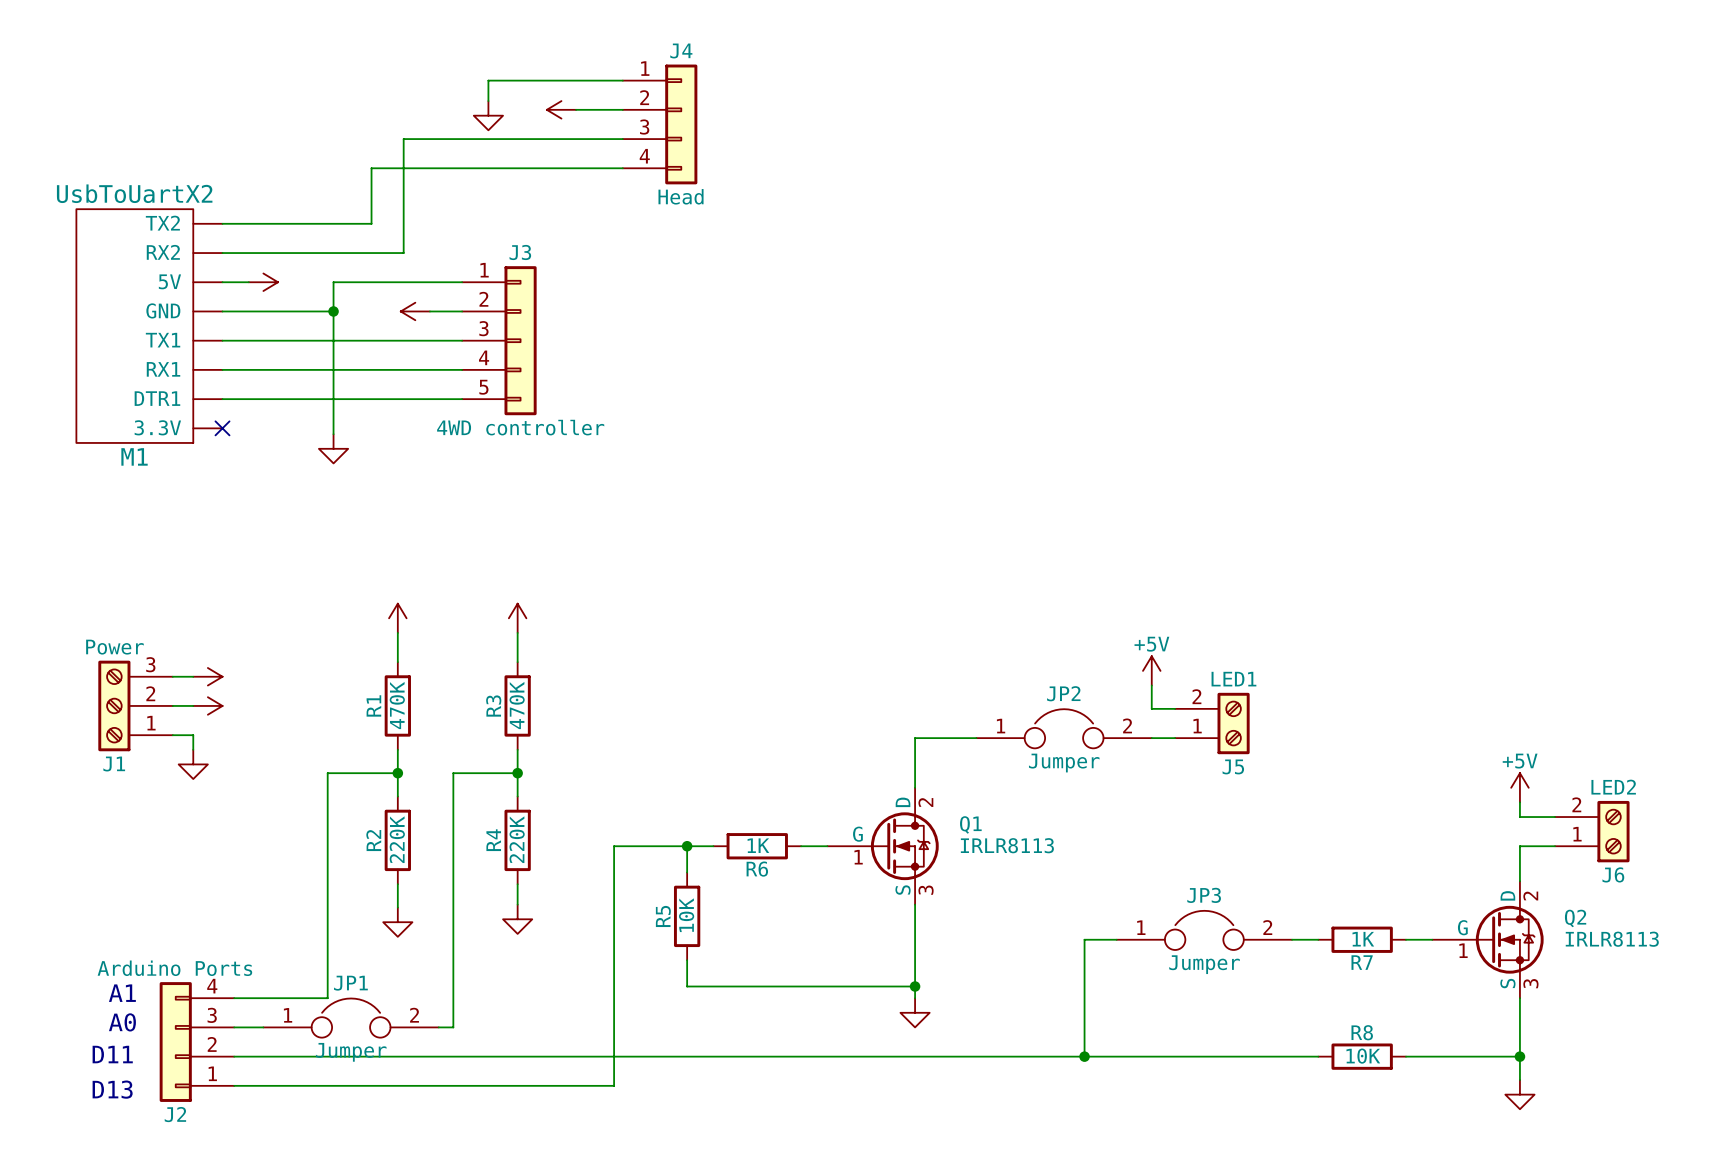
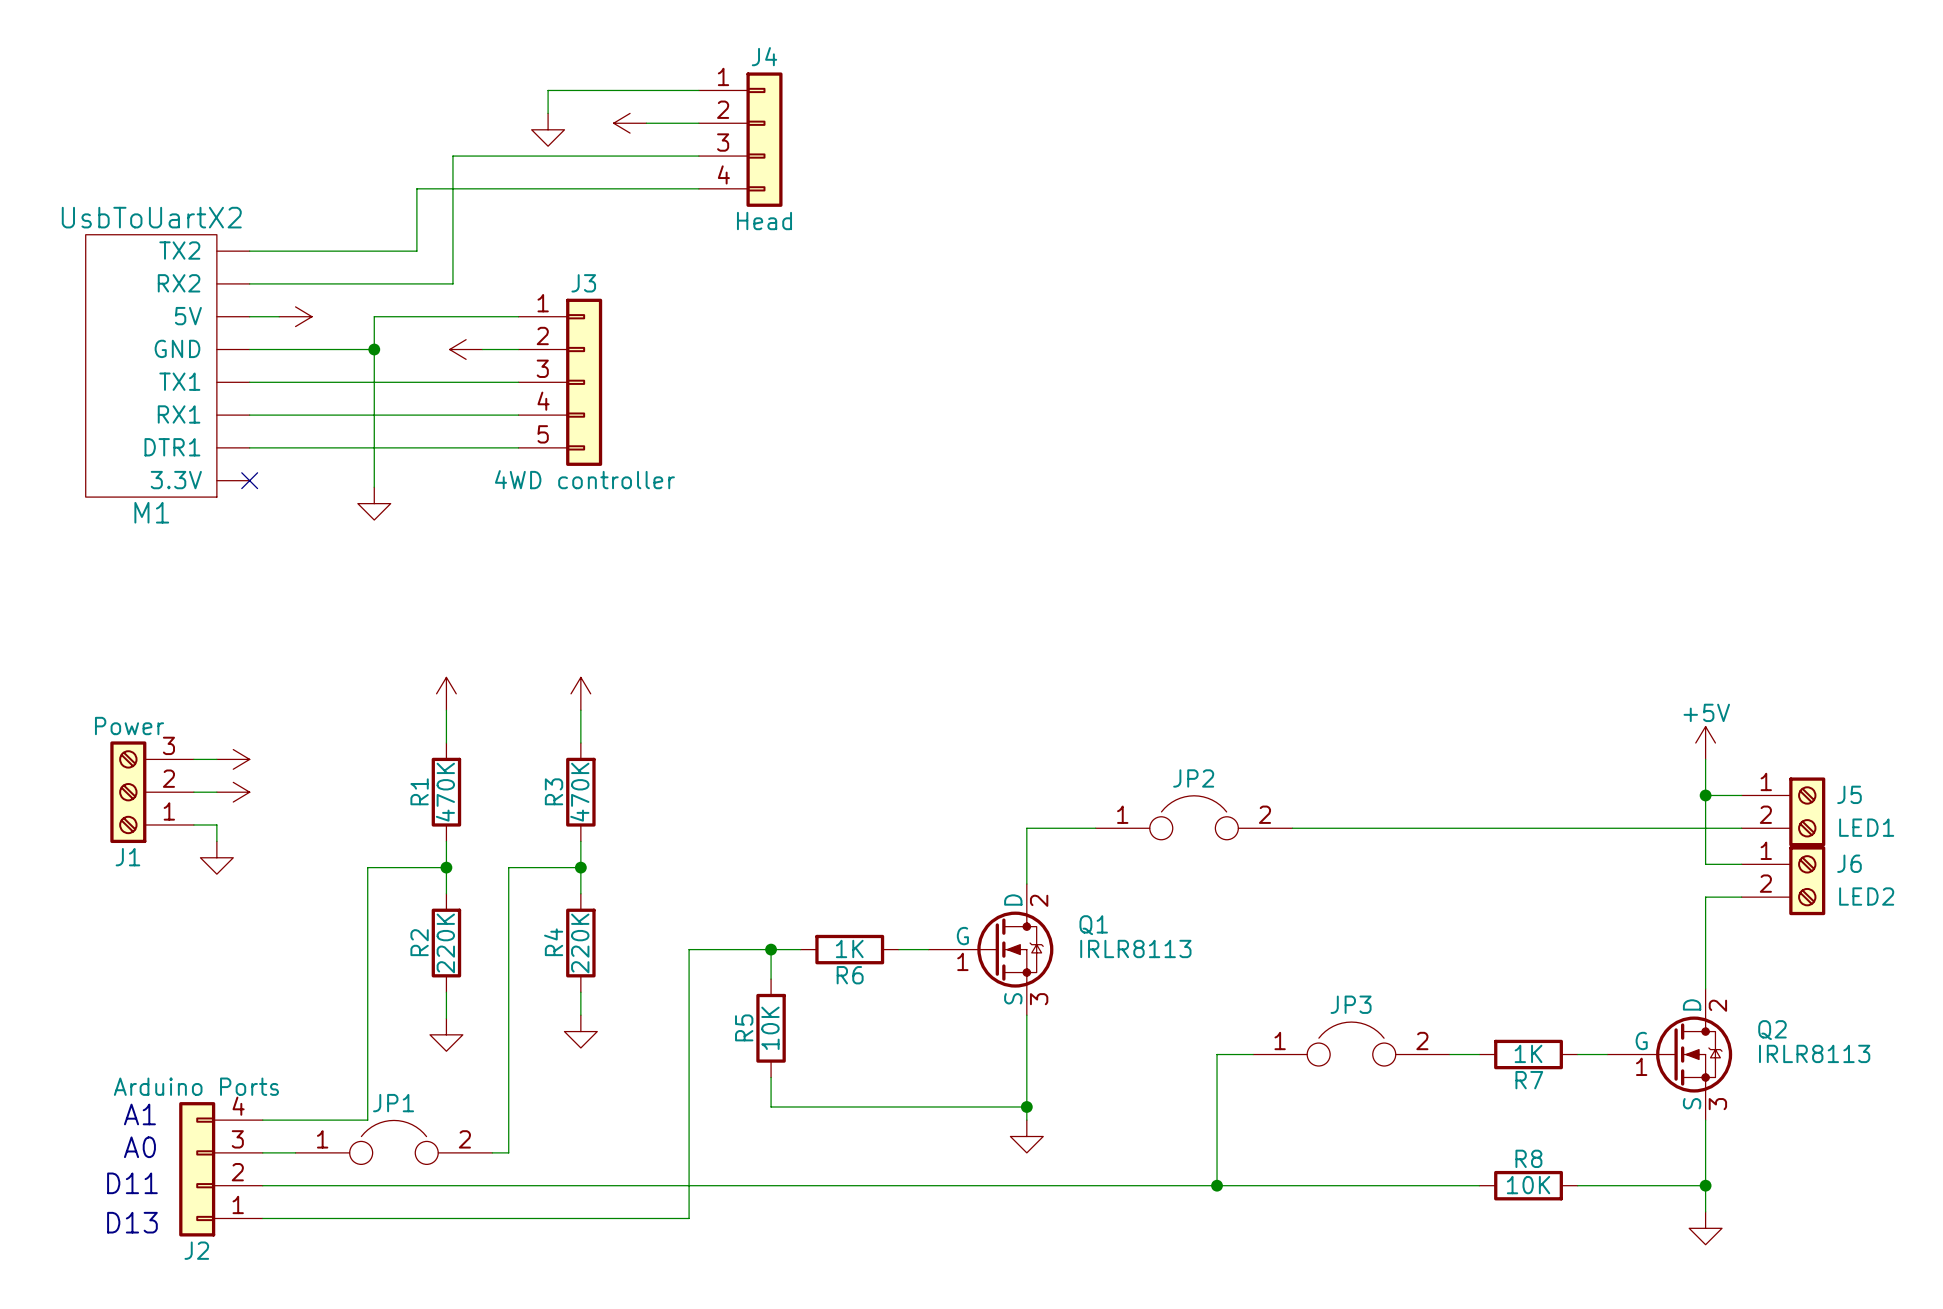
power symbol: +5V (1151, 670) -> none
wire: none -> (1705, 759) (1705, 864) (1741, 864)
J5 value position: LED1 (1233, 679) -> LED1 (1866, 827)
wire: (1151, 685) (1151, 708) (1175, 708) -> none
wire: none -> (1705, 795) (1741, 795)
junction: none -> (1705, 795)
J5 position: (1212, 723) -> (1783, 811)
J5 flip: as is (1233, 723) -> up-down (1807, 811)
wire: none -> (1318, 828) (1741, 828)
JP2 value: Jumper (1064, 763) -> none
J5 name position: J5 (1233, 766) -> J5 (1849, 794)
power symbol position: +5V (1519, 787) -> +5V (1705, 743)
J6 value position: LED2 (1613, 787) -> LED2 (1866, 896)
wire: none -> (1741, 897) (1705, 897) (1705, 900)
wire: (1519, 817) (1555, 817) -> (1705, 916) (1705, 949)
J6 position: (1592, 831) -> (1783, 880)
J6 flip: as is (1613, 831) -> up-down (1807, 880)
wire: (1519, 846) (1555, 846) -> none
J6 name position: J6 (1613, 874) -> J6 (1849, 863)
JP3 value: Jumper (1204, 964) -> none
JP1 value: Jumper (351, 1052) -> none

